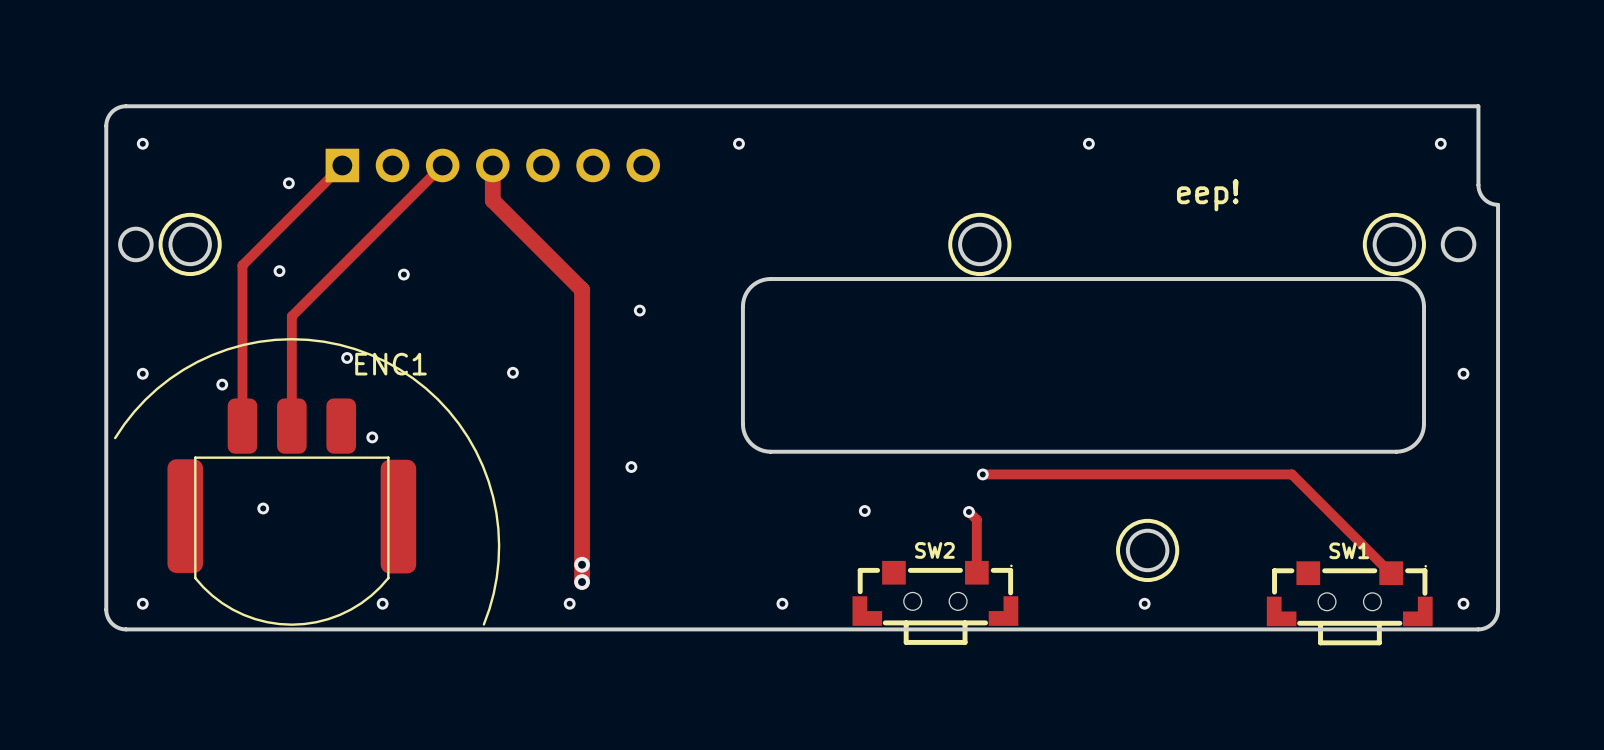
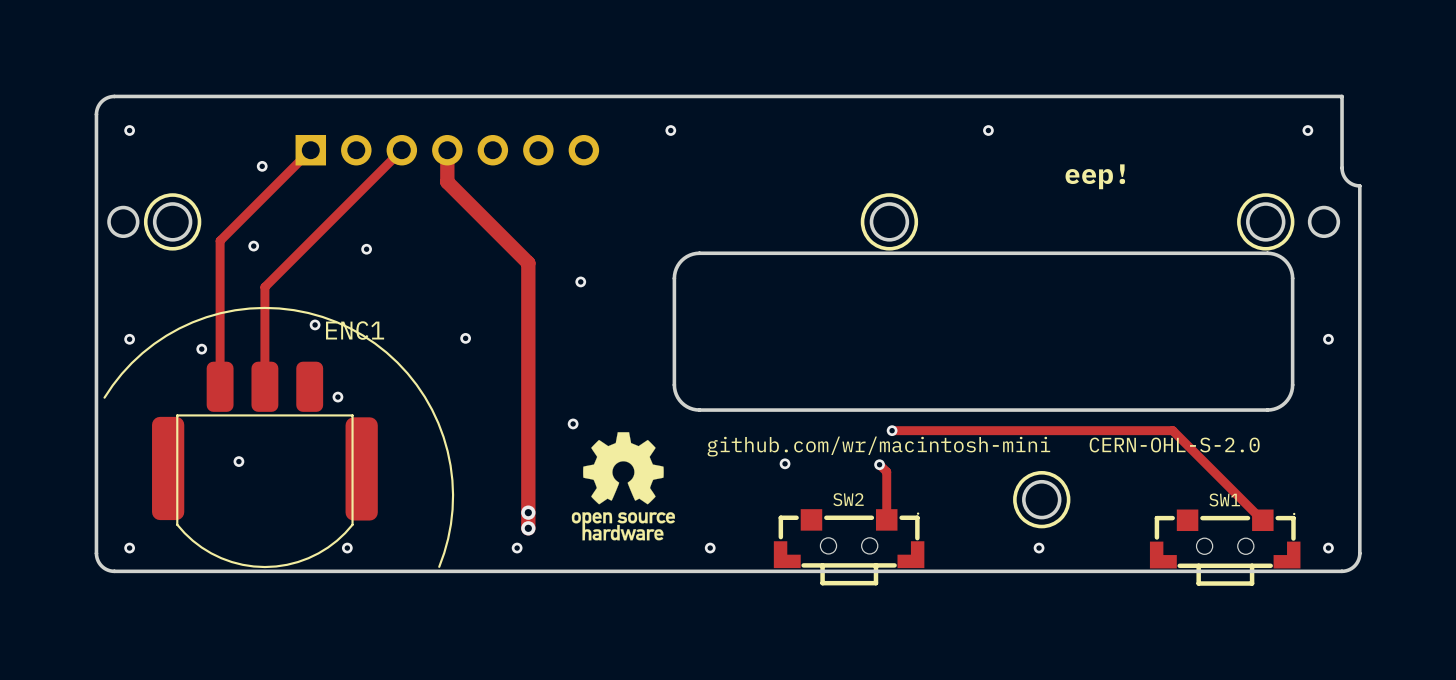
drawing: none -> [571, 432, 676, 541]
text: none -> github.com/wr/macintosh-mini CERN-OHL-S-2.0 (983, 446)

